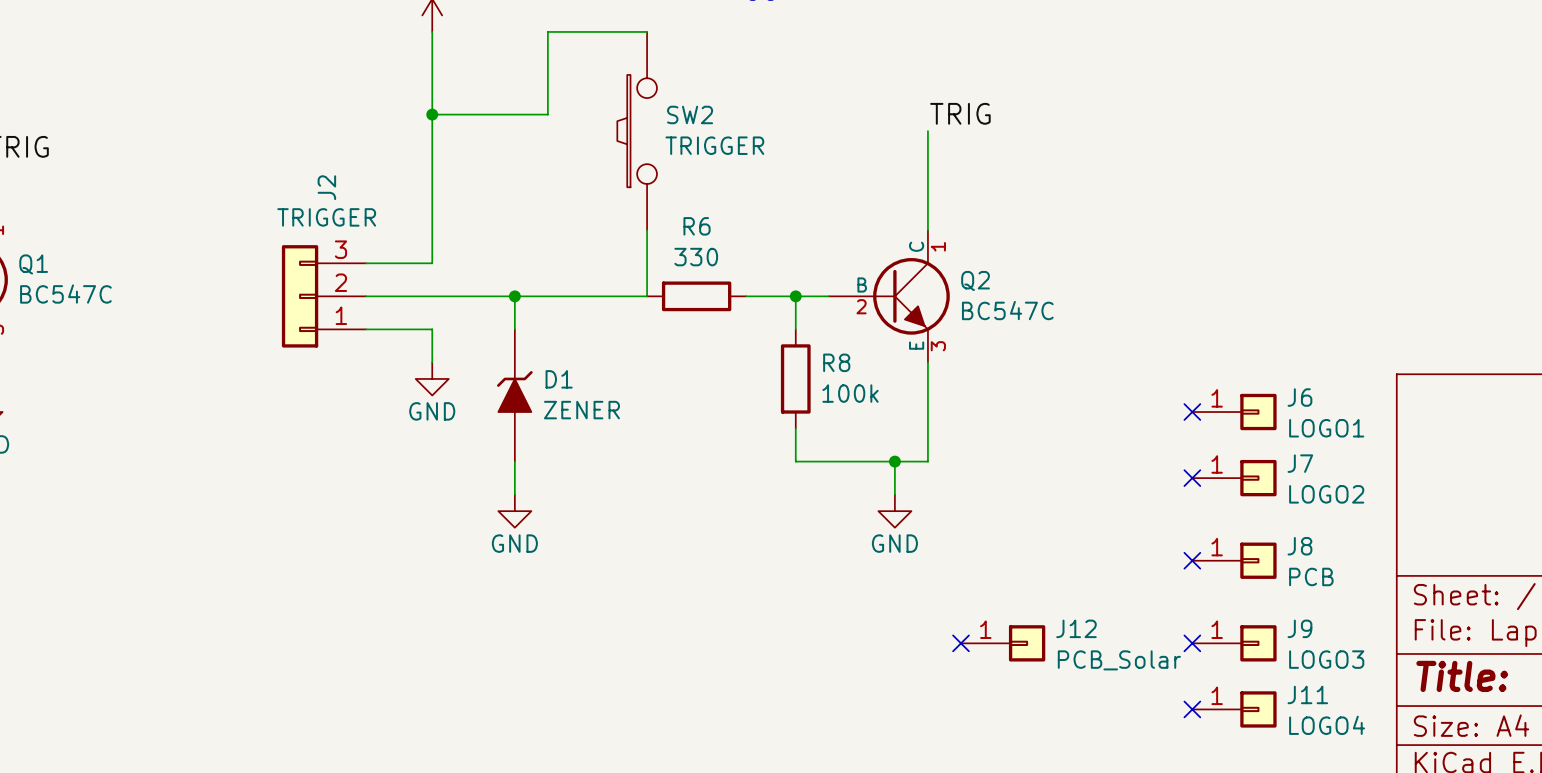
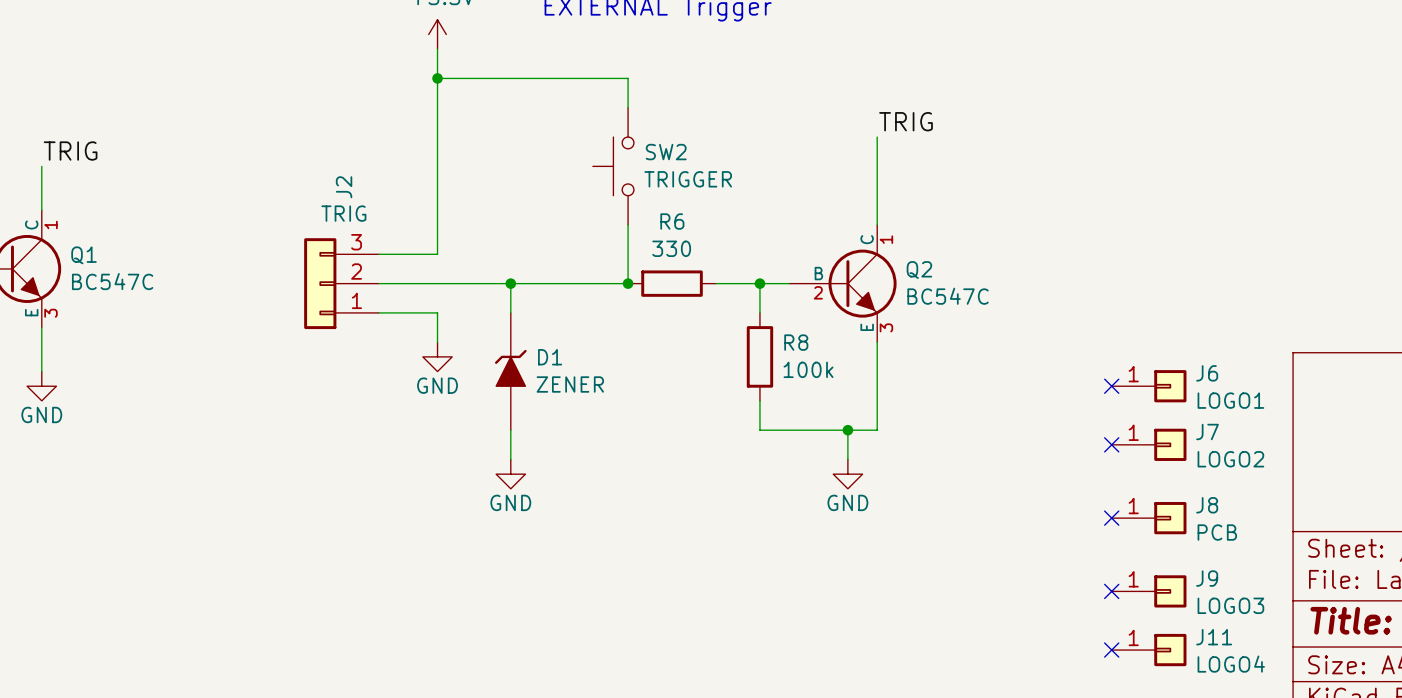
SW2 symbol: [617, 31, 657, 231] -> [592, 107, 634, 226]
wire: (647, 31) (547, 31) (547, 114) (432, 114) -> none
wire: none -> (437, 78) (628, 78) (628, 107)
junction position: (432, 114) -> (437, 78)
J2 value: TRIGGER (326, 217) -> TRIG (343, 213)
junction: none -> (628, 283)
no-connect mark: (961, 643) -> none
J12: PCB_Solar (1003, 643) -> none

